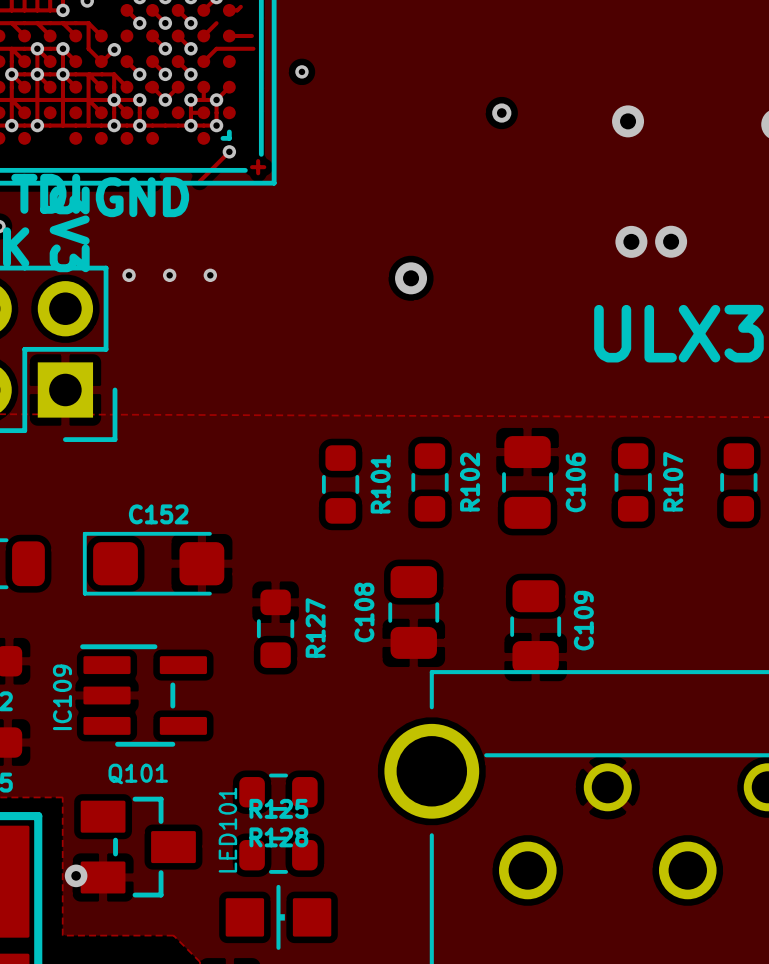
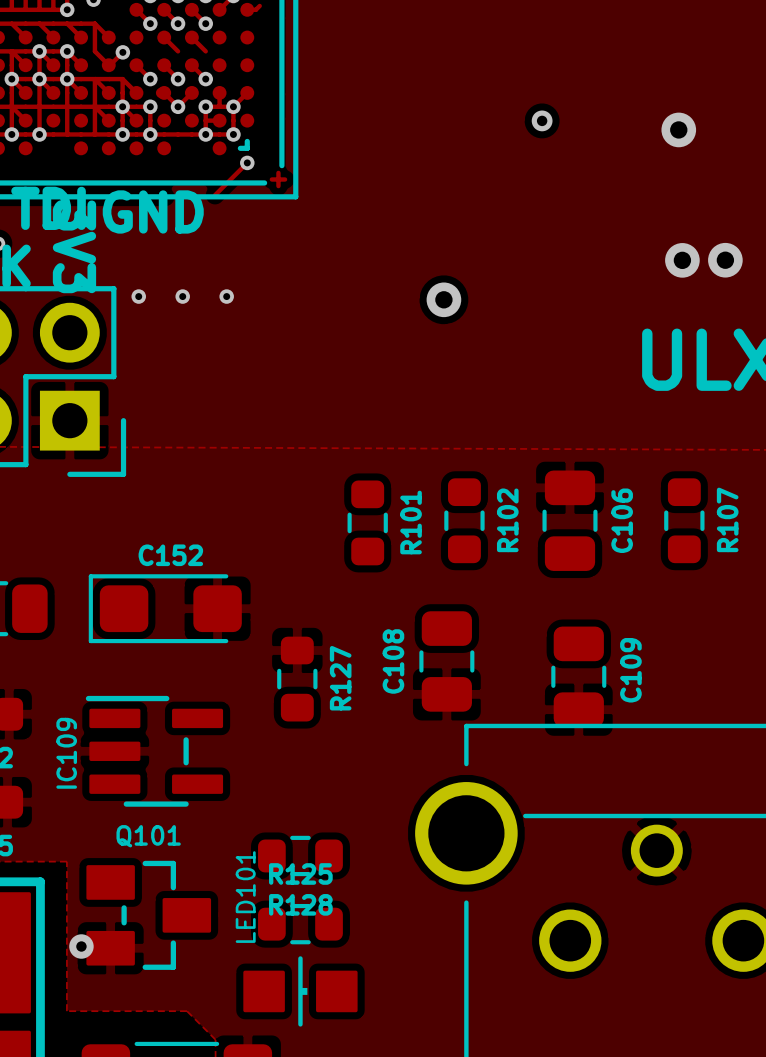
track: (216, 23) (203, 35) -> none
track: (229, 35) (251, 35) -> none
via: (165, 48) -> none
via: (190, 48) -> none
track: (253, 48) (216, 48) (203, 61) -> none
via: (301, 71) -> none

